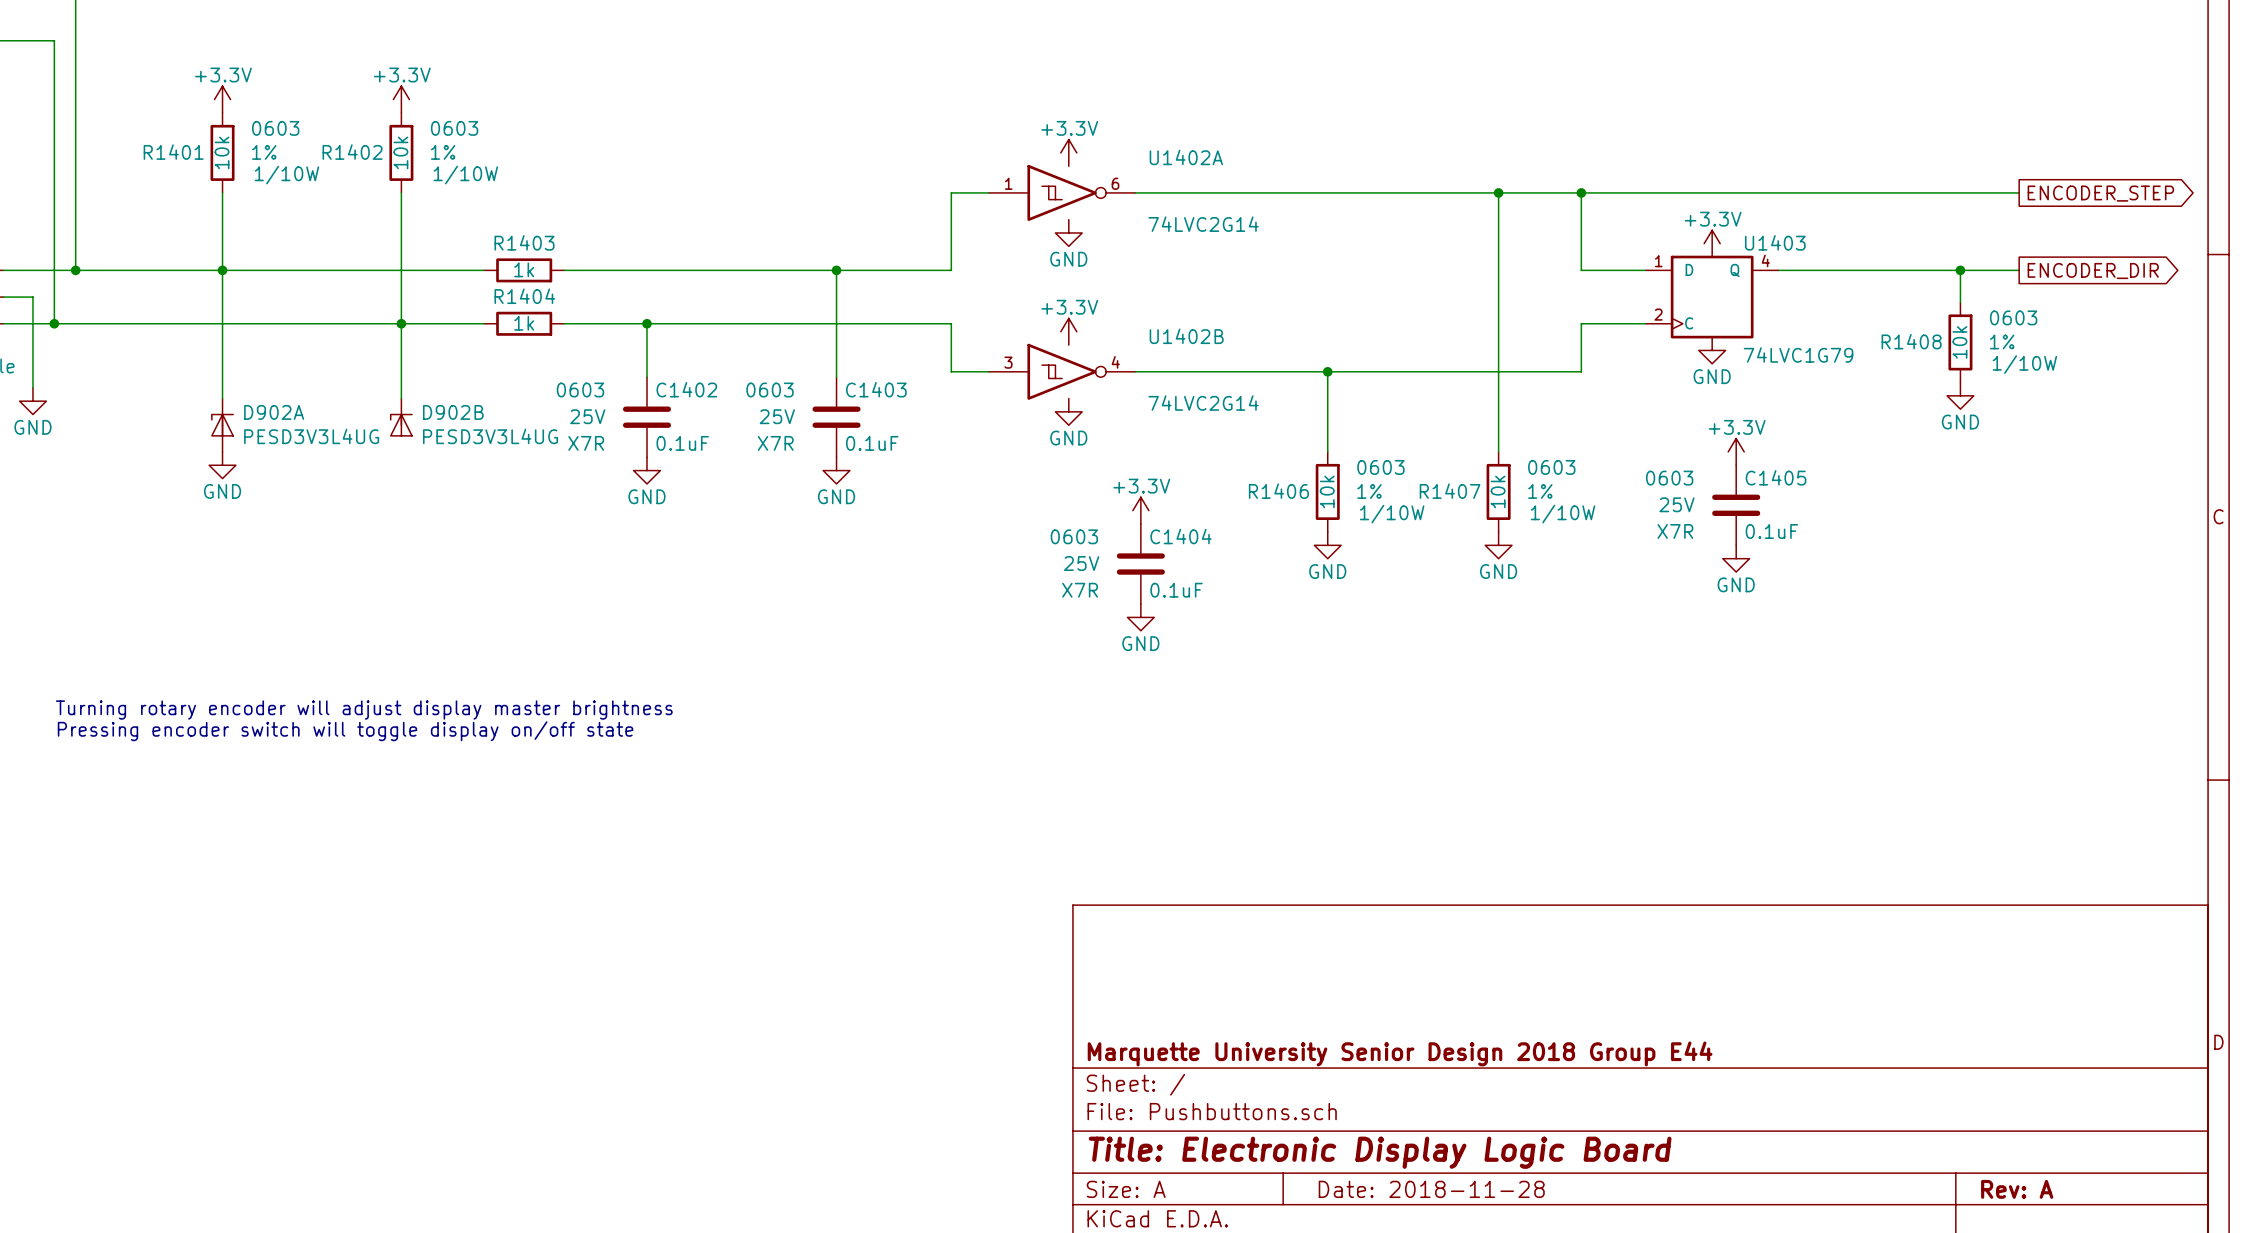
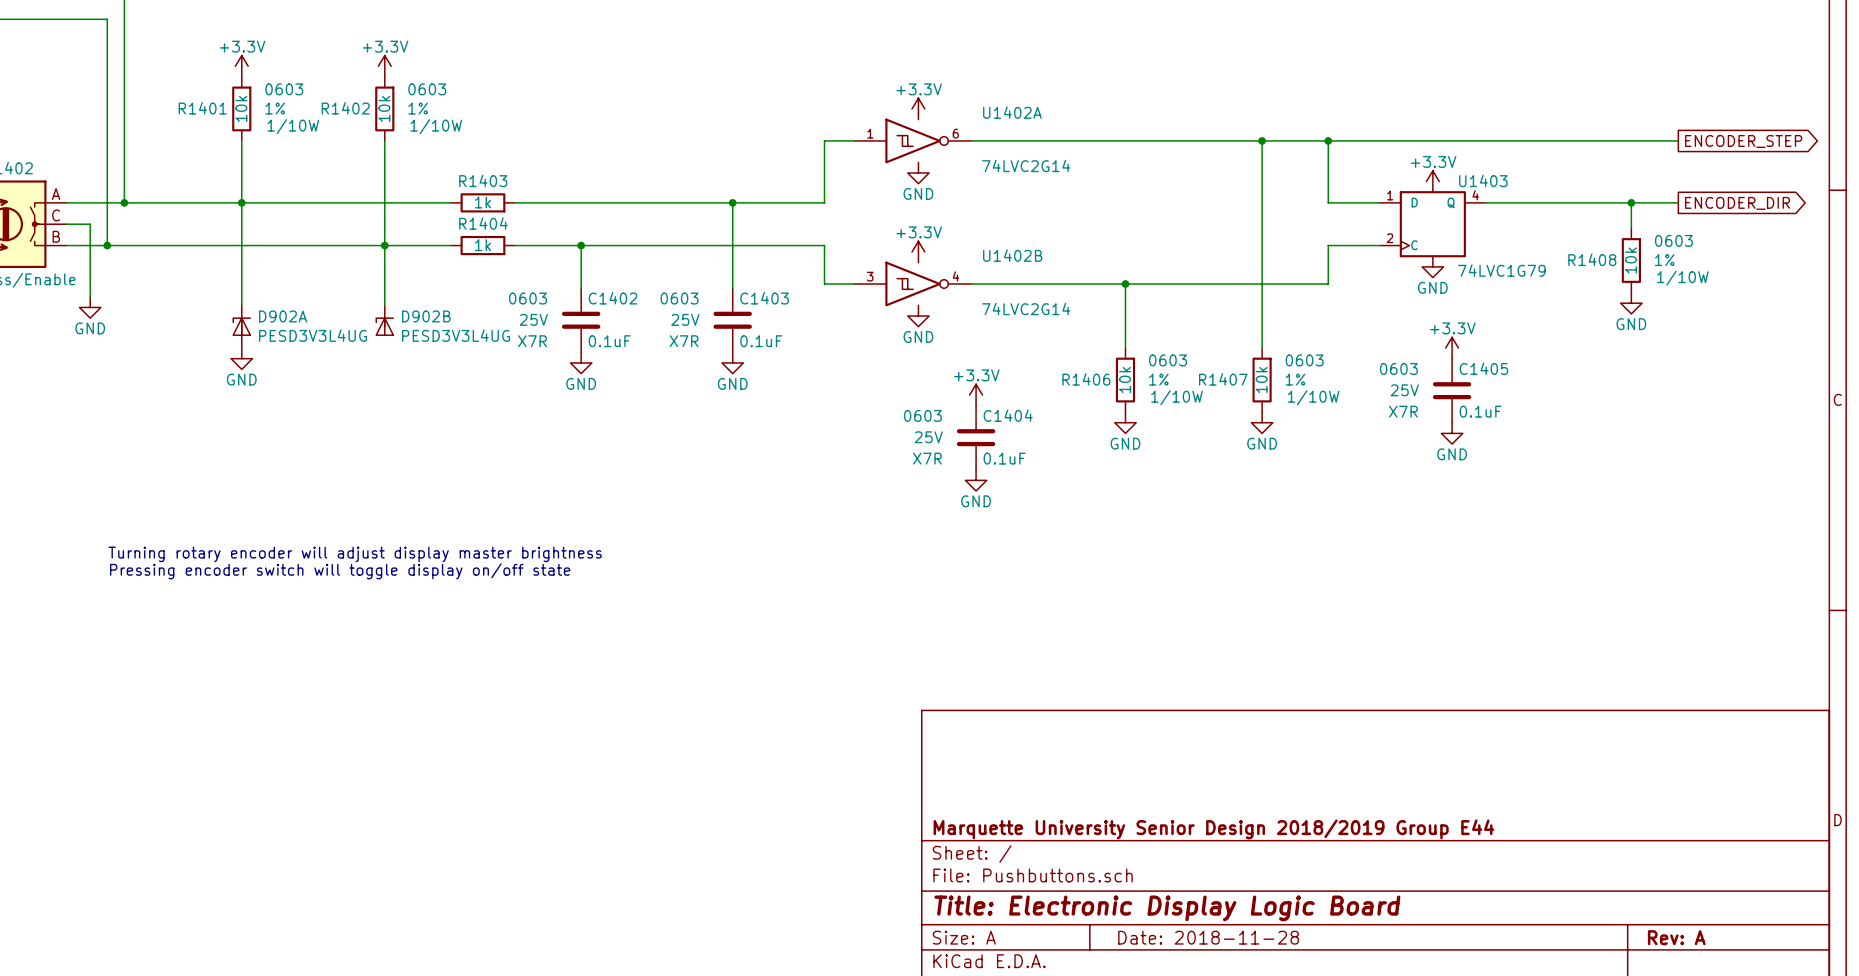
title block: Marquette University Senior Design 2018 Group E44 (1400, 1053) -> Marquette University Senior Design 2018/2019 Group E44 (1213, 829)

